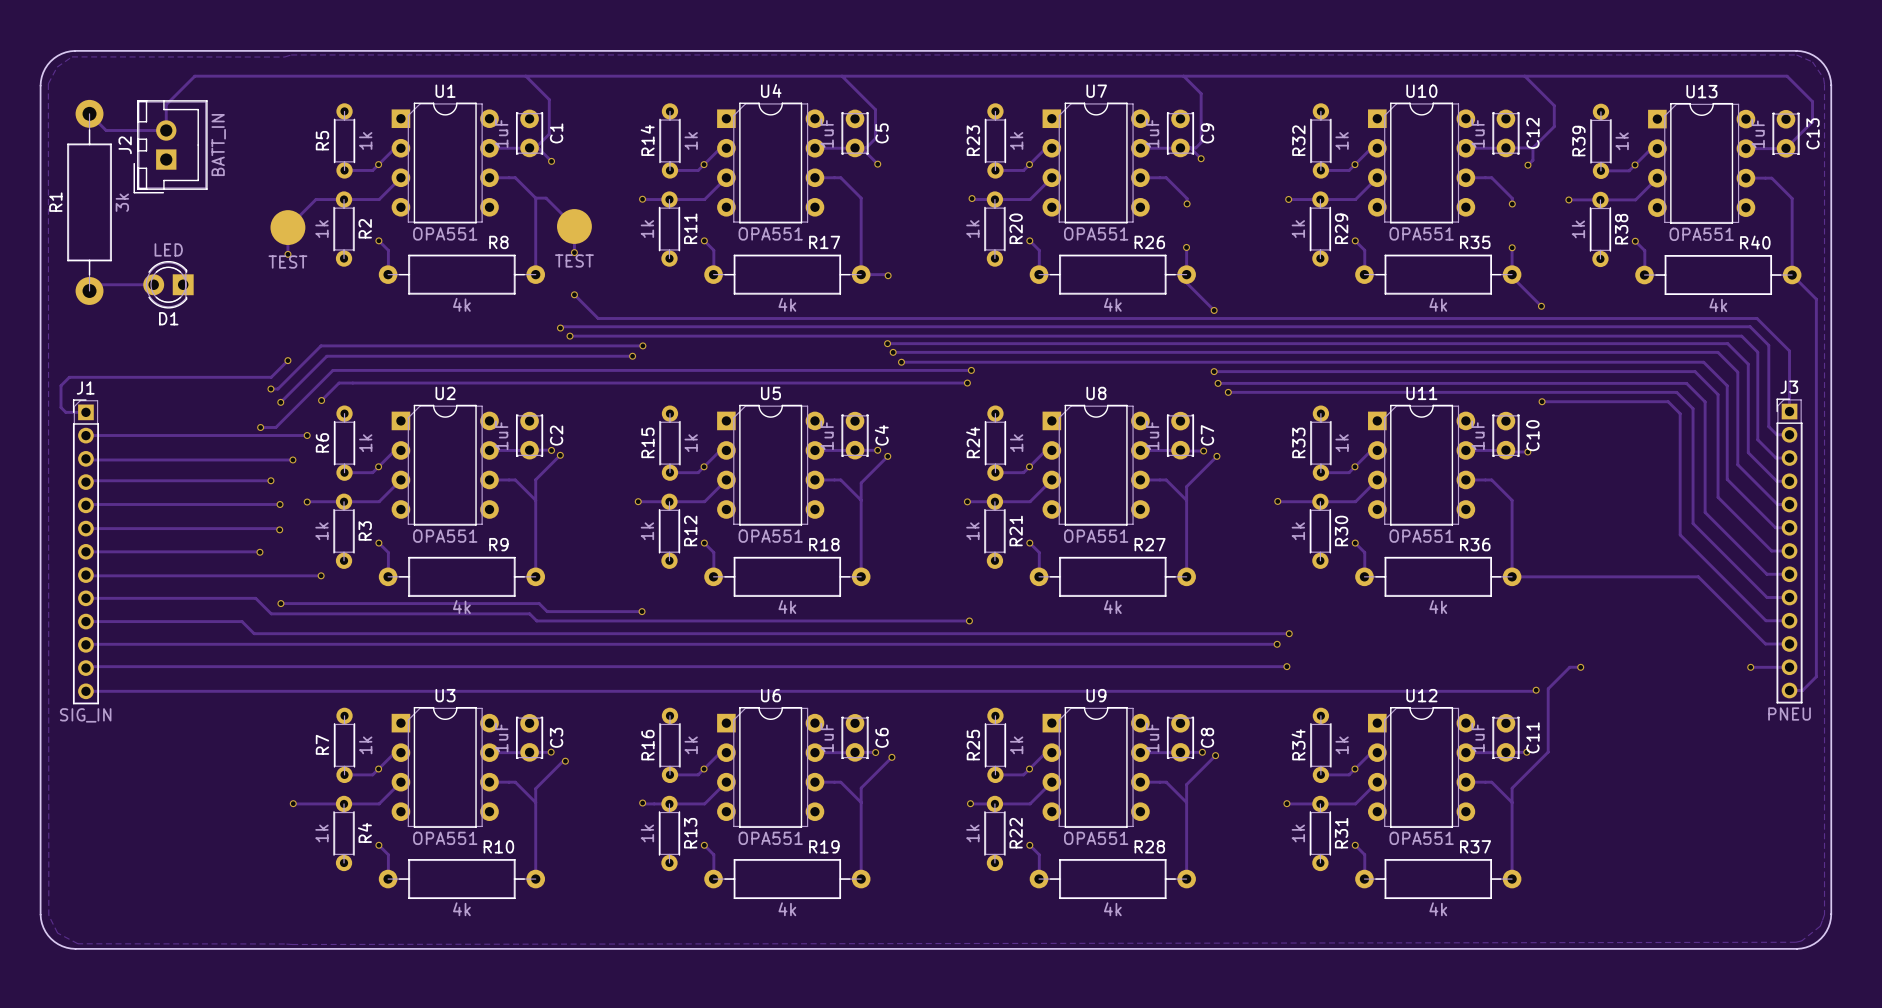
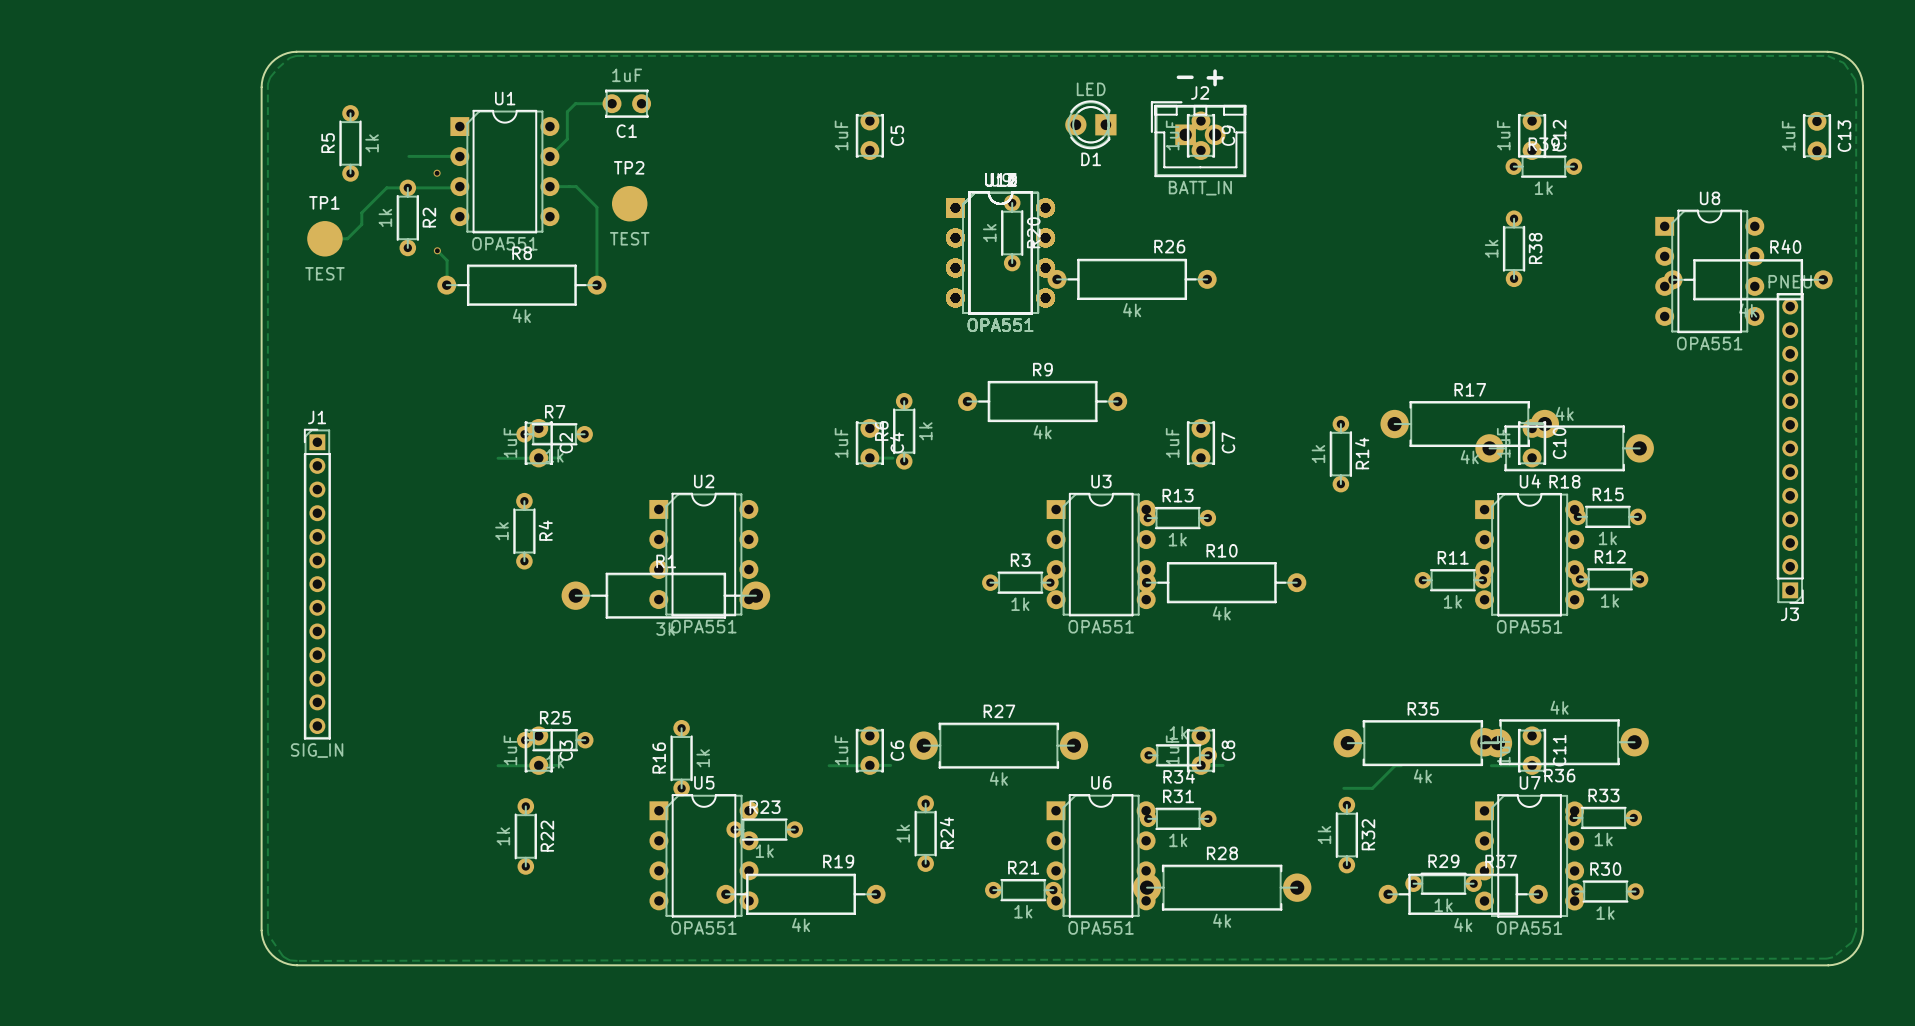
board edge: (74, 50) (1796, 50) -> (261, 87) (264, 73) (271, 62) (283, 54) (296, 51) (1827, 51)
board edge: (74, 50) (61, 53) (50, 61) (43, 72) (40, 85) (40, 914) (43, 927) (51, 938) (62, 946) (75, 948) -> none
zone outline: (284, 57) (71, 56) (57, 67) (48, 83) (48, 915) (57, 933) (77, 943) (284, 943) -> (289, 58) (270, 77) (267, 84) (267, 931) (283, 956) (289, 960)
text: none -> - (1185, 77)
track: (525, 76) (549, 99) (549, 134) (535, 147) -> none
track: (842, 76) (875, 109) (875, 138) (866, 147) (814, 148) -> none
track: (1183, 76) (1201, 93) (1201, 142) (1195, 147) (1140, 148) -> none
text: none -> + (1215, 77)
track: (1524, 76) (1554, 105) (1554, 126) (1532, 147) -> none
track: none -> (612, 103) (575, 103) (567, 111) (567, 139) (549, 156)
track: (89, 113) (106, 130) (166, 130) (166, 104) (194, 76) (1787, 76) (1812, 101) (1812, 121) (1785, 148) (1745, 148) -> none
C1 rotation: 0° (529, 133) -> 90° clockwise (626, 103)
C1 position: (529, 133) -> (626, 103)
R14 name position: R14 (647, 140) -> R14 (1362, 453)
R14 position: (669, 140) -> (1340, 454)
R14 value position: 1k (691, 140) -> 1k (1318, 454)
R23 rotation: 0° (995, 140) -> 90° clockwise (764, 829)
R23 position: (995, 140) -> (764, 829)
R32 name position: R32 (1298, 140) -> R32 (1368, 834)
R32 position: (1320, 140) -> (1346, 835)
R32 value position: 1k (1342, 140) -> 1k (1324, 835)
R39 rotation: 0° (1600, 141) -> 90° clockwise (1543, 166)
R39 position: (1600, 141) -> (1543, 166)
J2 rotation: 0° (170, 146) -> 90° clockwise (1198, 139)
J2 position: (170, 146) -> (1198, 139)
track: (861, 147) (877, 164) -> none
track: (1190, 147) (1201, 158) -> none
track: (1532, 147) (1532, 160) (1527, 165) -> none
track: (1532, 147) (1465, 148) -> none
track: (400, 148) (394, 148) (372, 170) (344, 170) -> none
track: (489, 148) (538, 147) (551, 161) -> none
track: (726, 148) (720, 148) (698, 170) (669, 170) -> none
track: (1051, 148) (1045, 148) (1023, 170) (995, 170) -> none
track: (1377, 148) (1371, 148) (1349, 170) (1320, 170) -> none
track: (1657, 148) (1651, 148) (1629, 170) (1600, 170) -> none
track: none -> (408, 156) (459, 156)
via: (1201, 158) -> none
via: (551, 161) -> none
U1 position: (445, 163) -> (504, 171)
U4 position: (770, 163) -> (1529, 554)
U7 position: (1096, 163) -> (1529, 855)
U10 position: (1421, 163) -> (1000, 252)
U13 position: (1701, 163) -> (1000, 252)
via: (378, 164) -> none
via: (704, 164) -> none
via: (877, 164) -> none
via: (1029, 164) -> none
via: (1354, 164) -> none
via: (1635, 164) -> none
via: (1527, 165) -> none
via: none -> (437, 173)
track: (400, 177) (379, 199) (315, 199) (287, 227) (287, 254) -> none
track: (489, 177) (515, 177) (535, 198) -> none
track: (726, 177) (704, 199) (642, 199) -> none
track: (814, 177) (840, 177) (861, 198) (861, 274) (888, 275) -> none
track: (1051, 177) (1030, 199) (972, 198) -> none
track: (1140, 177) (1166, 177) (1187, 198) (1187, 203) -> none
track: (1377, 177) (1355, 199) (1288, 199) -> none
track: (1465, 177) (1491, 177) (1512, 198) (1512, 204) -> none
track: (1657, 178) (1635, 199) (1568, 199) -> none
track: (1745, 178) (1771, 178) (1792, 198) (1792, 275) (1816, 299) (1816, 676) (1802, 690) (1789, 690) -> none
track: none -> (549, 186) (576, 186) (596, 207) (596, 285)
track: none -> (458, 187) (386, 187) (361, 212) (361, 224) (347, 238) (324, 238)
track: (535, 198) (546, 198) (574, 226) (574, 252) -> none
track: (535, 198) (535, 274) -> none
via: (972, 198) -> none
via: (642, 199) -> none
via: (1288, 199) -> none
via: (1568, 199) -> none
TP2: none -> TEST (629, 203)
R1 rotation: 0° (89, 202) -> 90° clockwise (665, 595)
R1 position: (89, 202) -> (665, 595)
via: (1187, 203) -> none
via: (1512, 204) -> none
part: TEST (574, 226) -> none
part: TEST (287, 227) -> none
R11 name position: R11 (690, 228) -> R11 (1453, 557)
R29 name position: R29 (1341, 228) -> R29 (1443, 861)
R2 position: (344, 229) -> (407, 217)
R11 value position: 1k (647, 229) -> 1k (1452, 601)
R11 rotation: 0° (669, 229) -> 90° clockwise (1452, 580)
R11 position: (669, 229) -> (1452, 580)
R29 value position: 1k (1298, 229) -> 1k (1443, 905)
R29 rotation: 0° (1320, 229) -> 90° clockwise (1443, 883)
R29 position: (1320, 229) -> (1443, 883)
R38 position: (1600, 229) -> (1514, 248)
TP1: none -> TEST (324, 238)
track: (378, 240) (388, 250) (388, 274) -> (437, 250) (447, 260) (446, 285)
via: (378, 240) -> none
track: (704, 240) (713, 250) (713, 274) -> none
via: (704, 240) -> none
track: (1029, 240) (1039, 250) (1039, 274) -> none
via: (1029, 240) -> none
track: (1355, 240) (1364, 250) (1364, 274) -> none
via: (1355, 240) -> none
track: (1635, 241) (1644, 250) (1644, 275) -> none
via: (1635, 241) -> none
R8 name position: R8 (498, 242) -> R8 (522, 253)
R17 name position: R17 (824, 242) -> R17 (1470, 389)
R35 name position: R35 (1475, 242) -> R35 (1423, 708)
via: none -> (437, 250)
track: (1186, 247) (1186, 282) (1214, 310) -> none
via: (1186, 247) -> none
track: (1512, 247) (1512, 276) (1541, 306) -> none
via: (1512, 247) -> none
via: (574, 252) -> none
via: (287, 254) -> none
R17 footprint: [704, 254, 871, 295] -> [1380, 401, 1560, 447]
R35 footprint: [1355, 254, 1522, 295] -> [1333, 720, 1513, 766]
R8 position: (461, 274) -> (521, 285)
via: (888, 275) -> none
track: (153, 284) (95, 284) (89, 290) -> none
D1 position: (168, 284) -> (1090, 124)
track: (574, 294) (598, 318) (1757, 318) (1789, 351) (1789, 411) -> none
via: (574, 294) -> none
via: (1541, 306) -> none
via: (1214, 310) -> none
track: (560, 328) (1750, 326) (1768, 345) (1768, 426) (1776, 434) (1789, 434) -> none
via: (560, 328) -> none
track: (569, 336) (1741, 336) (1757, 352) (1757, 439) (1776, 458) (1789, 458) -> none
via: (569, 336) -> none
track: (887, 343) (1727, 343) (1748, 364) (1748, 452) (1776, 481) (1789, 481) -> none
via: (887, 343) -> none
track: (642, 345) (321, 345) (277, 389) (270, 389) -> none
via: (642, 345) -> none
track: (893, 352) (1717, 352) (1737, 372) (1737, 464) (1777, 504) (1789, 504) -> none
via: (893, 352) -> none
track: (632, 356) (326, 356) (280, 402) -> none
via: (632, 356) -> none
track: (287, 360) (271, 377) (69, 377) (61, 385) (61, 407) (65, 412) (85, 412) -> none
via: (287, 360) -> none
track: (901, 362) (1703, 362) (1727, 385) (1727, 479) (1775, 527) (1789, 527) -> none
via: (901, 362) -> none
track: (971, 370) (332, 370) (275, 427) (260, 427) -> none
via: (971, 370) -> none
track: (1214, 371) (1695, 371) (1718, 394) (1718, 497) (1771, 551) (1789, 551) -> none
via: (1214, 371) -> none
track: (967, 383) (339, 383) (321, 400) -> none
via: (967, 383) -> none
track: (1218, 383) (1686, 383) (1705, 401) (1705, 512) (1766, 574) (1789, 574) -> none
via: (1218, 383) -> none
via: (270, 389) -> none
track: (1228, 392) (1676, 392) (1693, 408) (1693, 523) (1767, 597) (1789, 597) -> none
via: (1228, 392) -> none
via: (321, 400) -> none
track: (1542, 401) (1668, 401) (1680, 413) (1680, 534) (1765, 620) (1789, 620) -> none
via: (1542, 401) -> none
via: (280, 402) -> none
via: (260, 427) -> none
track: (86, 435) (307, 435) -> none
via: (307, 435) -> none
R24 name position: R24 (973, 442) -> R24 (946, 833)
R6 position: (344, 443) -> (904, 431)
R15 rotation: 0° (669, 443) -> 90° clockwise (1607, 516)
R15 position: (669, 443) -> (1607, 516)
R24 position: (995, 443) -> (925, 833)
R24 value position: 1k (1016, 443) -> 1k (903, 833)
R33 rotation: 0° (1320, 443) -> 90° clockwise (1603, 817)
R33 position: (1320, 443) -> (1603, 817)
track: (400, 450) (394, 450) (372, 472) (344, 472) -> none
via: (551, 450) -> none
track: (726, 450) (720, 450) (698, 472) (669, 472) -> none
track: (855, 450) (814, 450) -> none
via: (877, 450) -> none
track: (1051, 450) (1045, 450) (1023, 472) (995, 472) -> none
track: (1140, 450) (1203, 451) -> none
track: (1377, 450) (1371, 450) (1349, 472) (1320, 472) -> none
track: (1465, 450) (1527, 452) -> none
via: (1203, 451) -> none
via: (1527, 452) -> none
track: (560, 455) (535, 479) (535, 576) -> none
via: (560, 455) -> none
track: (887, 456) (861, 482) (861, 576) -> none
via: (887, 456) -> none
track: (1216, 456) (1186, 486) (1186, 576) -> none
via: (1216, 456) -> none
track: (85, 458) (292, 459) -> none
via: (292, 459) -> none
U2 position: (445, 465) -> (703, 554)
U5 position: (770, 465) -> (704, 855)
U8 position: (1096, 465) -> (1709, 271)
U11 position: (1421, 465) -> (1000, 252)
via: (378, 466) -> none
via: (704, 466) -> none
via: (1029, 466) -> none
via: (1354, 466) -> none
track: (400, 479) (379, 501) (307, 502) -> none
track: (489, 479) (515, 479) (535, 500) -> none
track: (726, 479) (704, 501) (638, 501) -> none
track: (814, 479) (840, 479) (861, 500) -> none
track: (1051, 479) (1030, 501) (967, 501) -> none
track: (1140, 479) (1166, 479) (1186, 500) -> none
track: (1377, 479) (1355, 501) (1277, 501) -> none
track: (1465, 479) (1491, 479) (1512, 500) (1512, 576) (1698, 576) (1765, 644) (1789, 644) -> none
track: (270, 480) (85, 482) -> none
via: (270, 480) -> none
via: (638, 501) -> none
via: (967, 501) -> none
via: (1277, 501) -> none
via: (307, 502) -> none
track: (280, 504) (85, 505) -> none
via: (280, 504) -> none
track: (85, 528) (279, 529) -> none
via: (279, 529) -> none
R3 name position: R3 (365, 530) -> R3 (1020, 560)
R12 name position: R12 (690, 530) -> R12 (1610, 556)
R21 name position: R21 (1016, 530) -> R21 (1023, 867)
R30 name position: R30 (1341, 530) -> R30 (1605, 869)
R3 value position: 1k (321, 531) -> 1k (1020, 604)
R3 rotation: 0° (344, 531) -> 90° clockwise (1020, 582)
R3 position: (344, 531) -> (1020, 582)
R12 value position: 1k (647, 531) -> 1k (1609, 600)
R12 rotation: 0° (669, 531) -> 90° clockwise (1609, 579)
R12 position: (669, 531) -> (1609, 579)
R21 value position: 1k (972, 531) -> 1k (1023, 911)
R21 rotation: 0° (994, 531) -> 90° clockwise (1023, 890)
R21 position: (994, 531) -> (1023, 890)
R30 value position: 1k (1298, 531) -> 1k (1605, 913)
R30 rotation: 0° (1320, 531) -> 90° clockwise (1605, 891)
R30 position: (1320, 531) -> (1605, 891)
track: (378, 543) (388, 552) (388, 576) -> none
via: (378, 543) -> none
track: (704, 543) (713, 552) (713, 576) -> none
via: (704, 543) -> none
track: (1029, 543) (1039, 552) (1039, 576) -> none
via: (1029, 543) -> none
track: (1355, 543) (1364, 552) (1364, 576) -> none
via: (1355, 543) -> none
R9 name position: R9 (498, 544) -> R9 (1042, 369)
R18 name position: R18 (824, 544) -> R18 (1564, 481)
R27 name position: R27 (1150, 544) -> R27 (999, 711)
R36 name position: R36 (1475, 544) -> R36 (1559, 775)
track: (85, 551) (259, 552) -> none
J1 position: (85, 551) -> (317, 584)
J3 rotation: 0° (1789, 551) -> 180° (1790, 448)
via: (259, 552) -> none
R18 footprint: [704, 556, 871, 597] -> [1475, 425, 1654, 472]
R27 footprint: [1029, 556, 1196, 597] -> [909, 722, 1089, 769]
R36 footprint: [1355, 556, 1522, 597] -> [1470, 719, 1649, 765]
track: (85, 575) (321, 575) -> none
via: (321, 575) -> none
R9 position: (461, 576) -> (1042, 401)
track: (85, 598) (255, 598) (271, 613) (529, 613) (536, 620) (969, 620) -> none
track: (280, 603) (539, 603) (547, 611) (642, 611) -> none
via: (280, 603) -> none
R18 value position: 4k (787, 607) -> 4k (1564, 413)
R36 value position: 4k (1438, 607) -> 4k (1559, 707)
via: (642, 611) -> none
via: (969, 620) -> none
track: (85, 621) (242, 621) (254, 633) (1289, 633) -> none
via: (1289, 633) -> none
track: (1277, 644) (85, 644) -> none
via: (1277, 644) -> none
track: (1286, 666) (85, 668) -> none
via: (1286, 666) -> none
track: (1580, 667) (1569, 667) (1548, 688) (1548, 752) (1512, 788) (1512, 879) -> none
via: (1580, 667) -> none
track: (1750, 667) (1789, 667) -> none
via: (1750, 667) -> none
track: (1536, 690) (85, 691) -> none
via: (1536, 690) -> none
R34 name position: R34 (1298, 744) -> R34 (1179, 776)
R7 rotation: 0° (344, 745) -> 90° clockwise (554, 434)
R7 position: (344, 745) -> (554, 434)
R25 rotation: 0° (995, 745) -> 90° clockwise (555, 740)
R25 position: (995, 745) -> (555, 740)
R34 rotation: 0° (1320, 745) -> 90° clockwise (1178, 755)
R34 position: (1320, 745) -> (1178, 755)
R34 value position: 1k (1342, 745) -> 1k (1178, 732)
track: (400, 752) (394, 752) (372, 774) (344, 774) -> none
via: (551, 752) -> none
track: (726, 752) (720, 752) (698, 774) (669, 774) -> none
via: (875, 752) -> none
track: (1051, 752) (1045, 752) (1023, 774) (995, 774) -> none
via: (1202, 752) -> none
via: (1526, 752) -> none
track: (1215, 755) (1186, 784) (1186, 879) -> none
via: (1215, 755) -> none
track: (891, 757) (861, 788) (861, 879) -> none
via: (891, 757) -> none
track: (565, 761) (563, 761) (535, 788) (535, 879) -> none
via: (565, 761) -> none
U3 position: (445, 767) -> (1101, 554)
U6 position: (770, 767) -> (1101, 855)
U9 position: (1096, 767) -> (1000, 252)
U12 position: (1421, 767) -> (1000, 252)
via: (378, 769) -> none
via: (704, 769) -> none
via: (1029, 769) -> none
via: (1354, 769) -> none
track: (400, 782) (379, 803) (293, 803) -> none
track: (489, 782) (515, 782) (535, 802) -> none
track: (726, 782) (704, 803) (642, 803) -> none
track: (814, 782) (840, 782) (861, 802) -> none
track: (1051, 782) (1030, 803) (970, 803) -> none
track: (1140, 782) (1166, 782) (1186, 802) -> none
track: (1377, 782) (1355, 803) (1286, 803) -> none
track: (1465, 782) (1491, 782) (1512, 802) -> none
via: (293, 803) -> none
via: (642, 803) -> none
via: (970, 803) -> none
via: (1286, 803) -> none
R4 position: (344, 833) -> (524, 531)
R13 value position: 1k (647, 833) -> 1k (1177, 539)
R13 rotation: 0° (669, 833) -> 90° clockwise (1177, 518)
R13 position: (669, 833) -> (1177, 518)
R13 name position: R13 (690, 833) -> R13 (1178, 495)
R22 position: (994, 833) -> (525, 836)
R31 value position: 1k (1298, 833) -> 1k (1178, 840)
R31 rotation: 0° (1320, 833) -> 90° clockwise (1178, 818)
R31 position: (1320, 833) -> (1178, 818)
R31 name position: R31 (1341, 833) -> R31 (1178, 796)
track: (378, 845) (388, 854) (388, 879) -> none
via: (378, 845) -> none
track: (704, 845) (713, 854) (713, 879) -> none
via: (704, 845) -> none
track: (1029, 845) (1039, 854) (1039, 879) -> none
via: (1029, 845) -> none
track: (1355, 845) (1364, 854) (1364, 879) -> none
via: (1355, 845) -> none
R10 name position: R10 (498, 846) -> R10 (1222, 550)
R28 name position: R28 (1149, 846) -> R28 (1222, 853)
R28 footprint: [1029, 859, 1196, 900] -> [1132, 864, 1312, 911]
R10 position: (461, 879) -> (1221, 582)
board edge: (75, 948) (1797, 948) -> (261, 87) (261, 930) (266, 947) (279, 960) (297, 965) (1828, 965)

